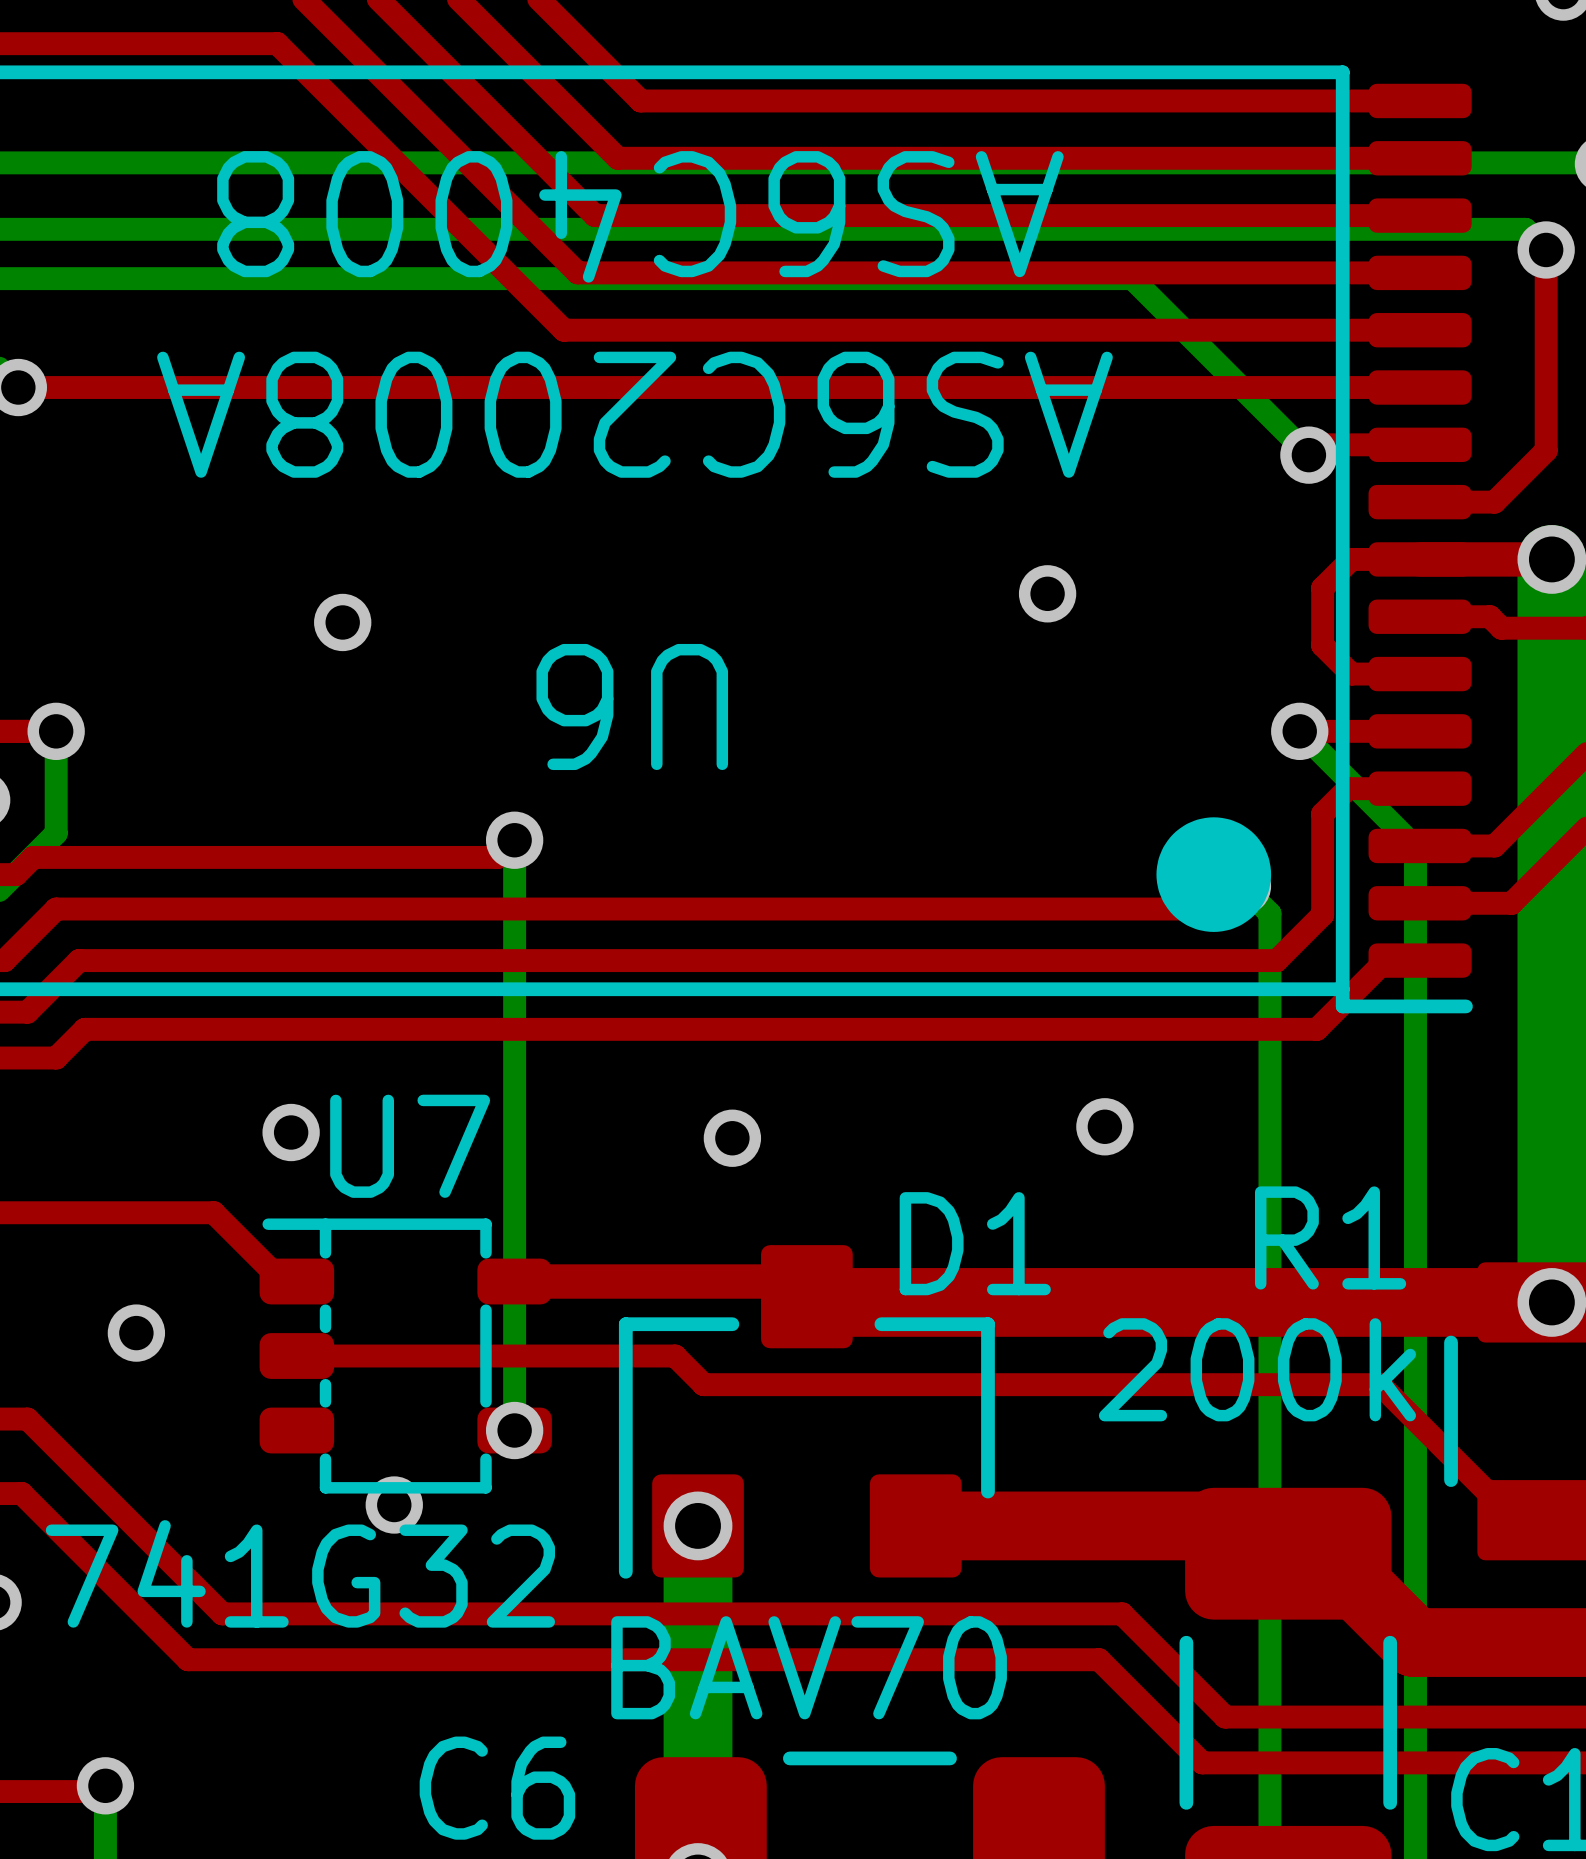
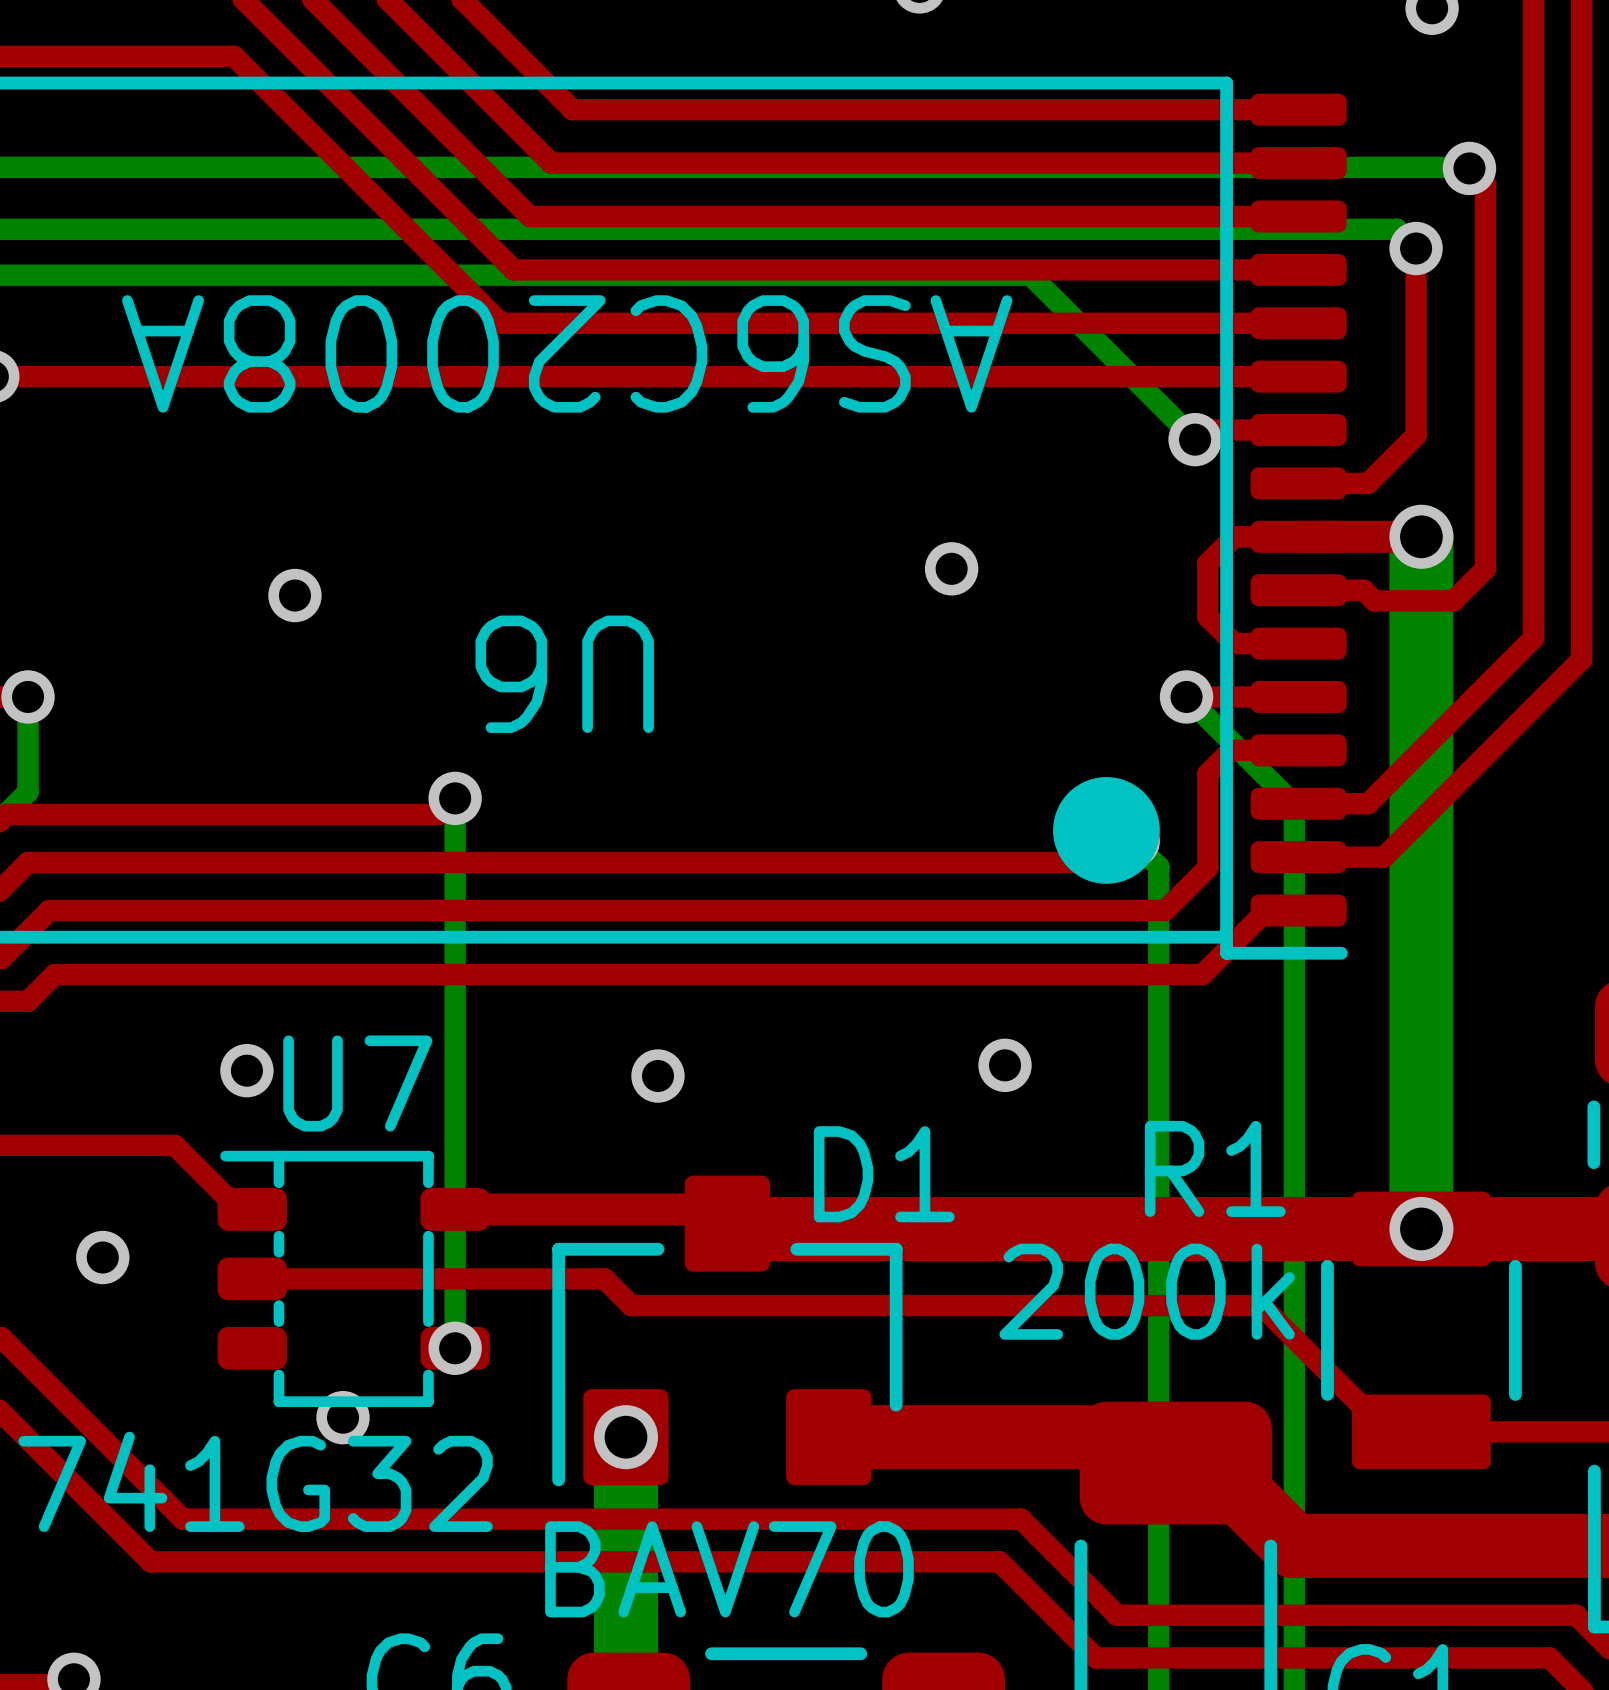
U6 text: AS6C4008 (640, 216) -> none
U6 value position: AS6C2008A (634, 414) -> AS6C2008A (567, 353)

